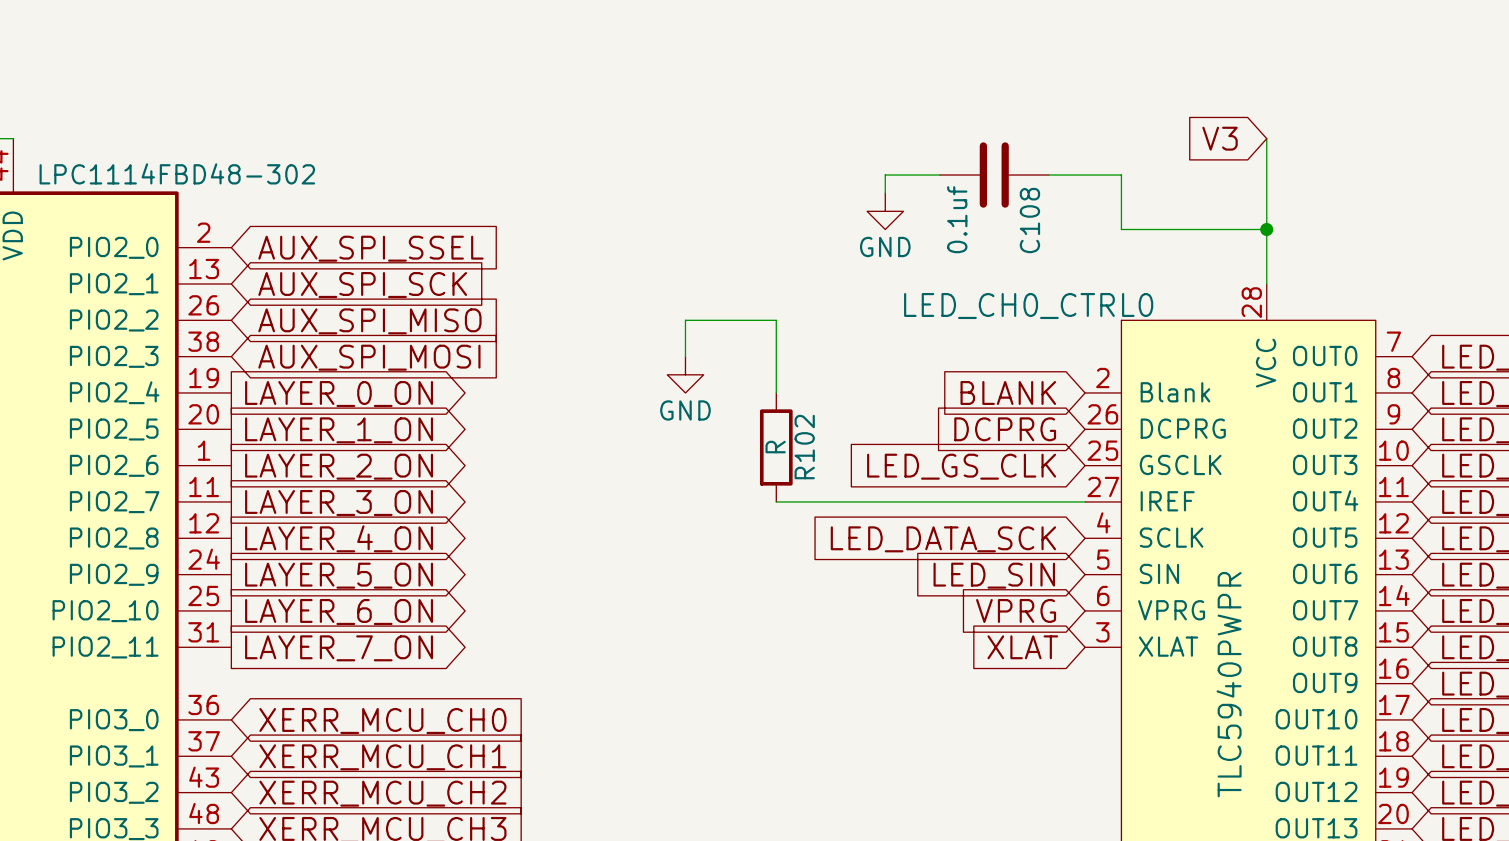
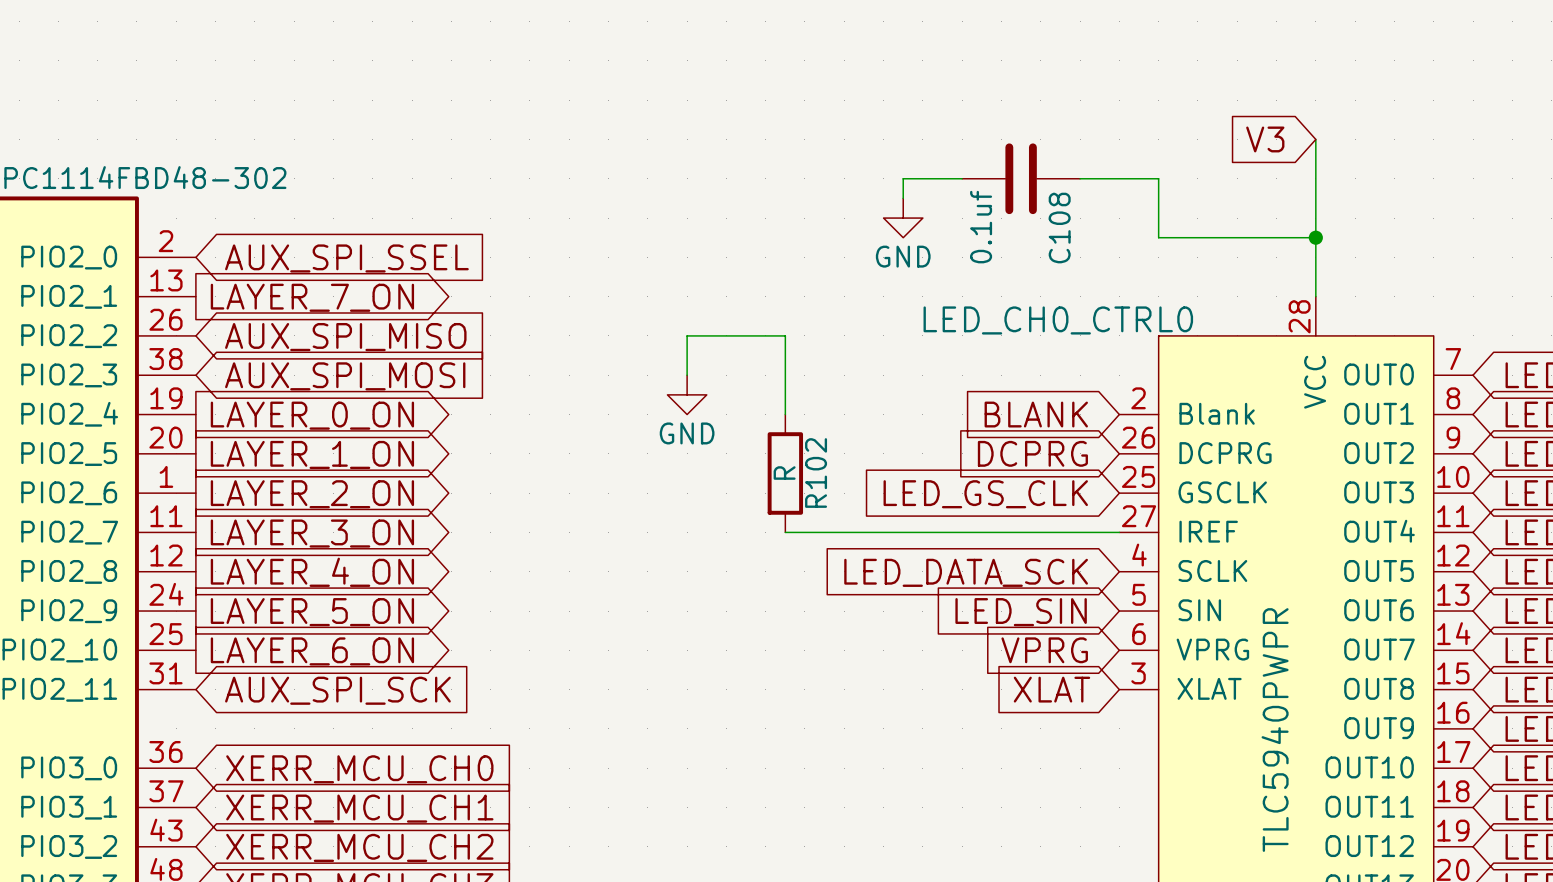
global label shape: input (362, 285) -> output (312, 297)
global label: AUX_SPI_SCK (362, 285) -> LAYER_7_ON (312, 297)
global label shape: output (339, 648) -> input (337, 690)
global label: LAYER_7_ON (339, 648) -> AUX_SPI_SCK (337, 690)

